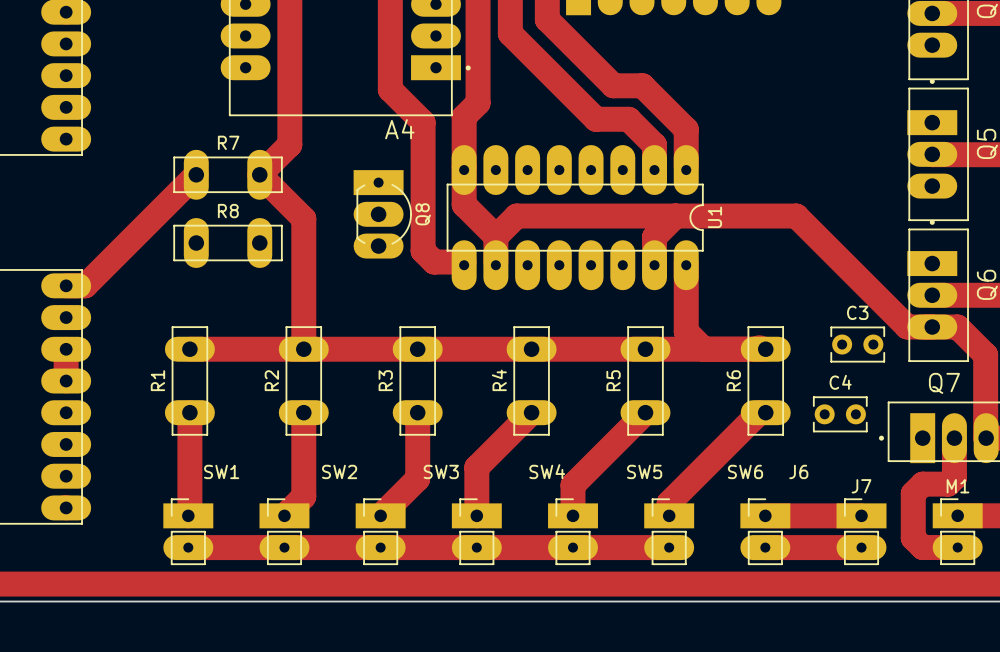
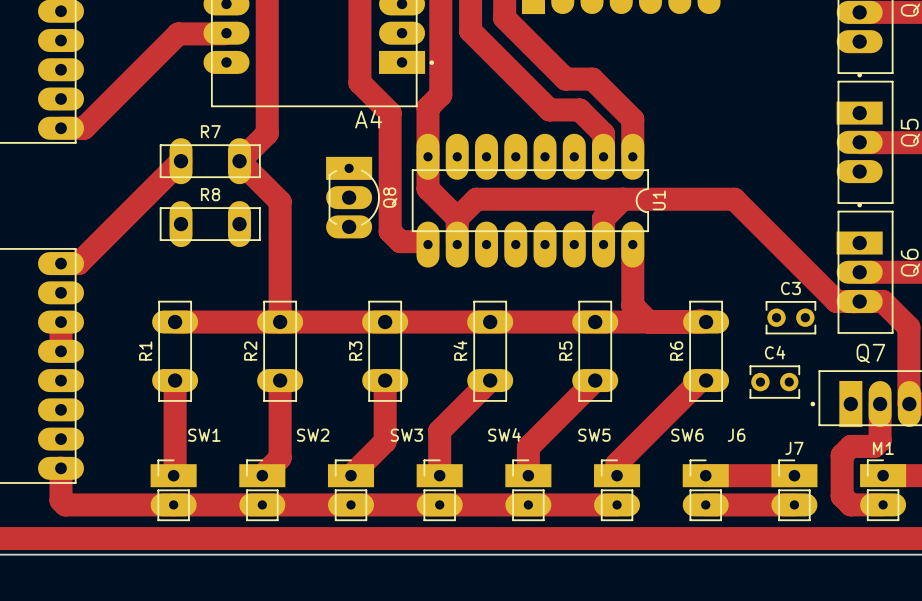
track: none -> (224, 33) (178, 33) (83, 128) (61, 128)
track: none -> (61, 468) (61, 500) (65, 504) (173, 504)

